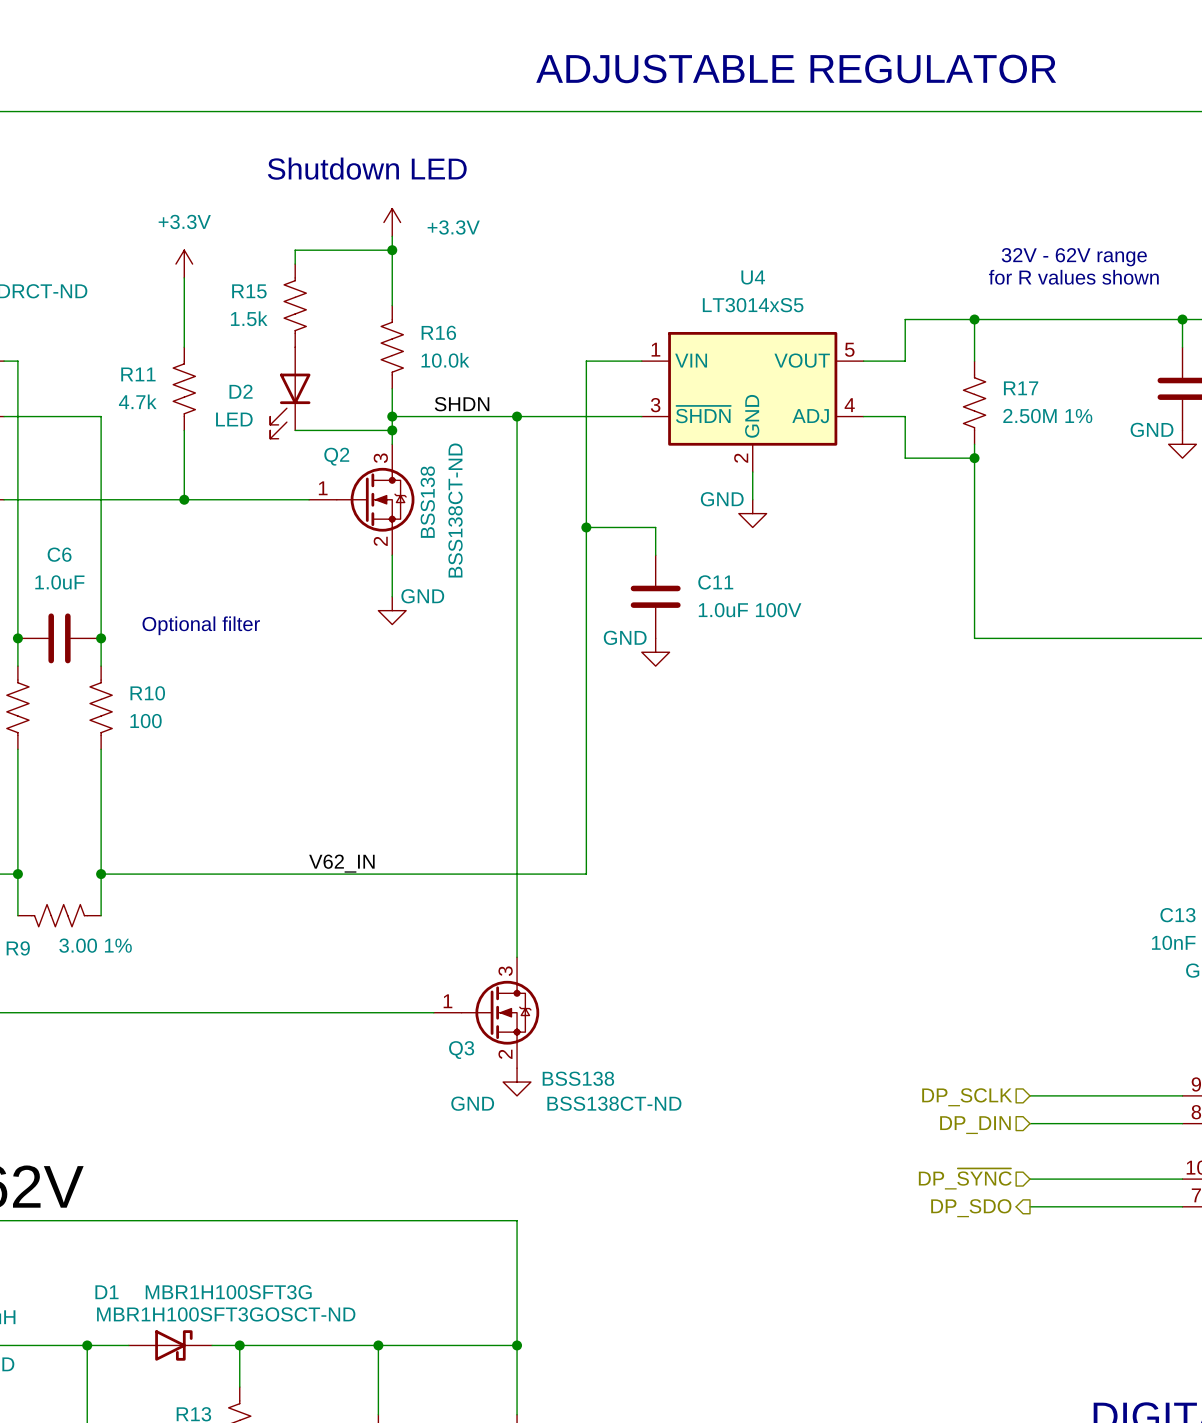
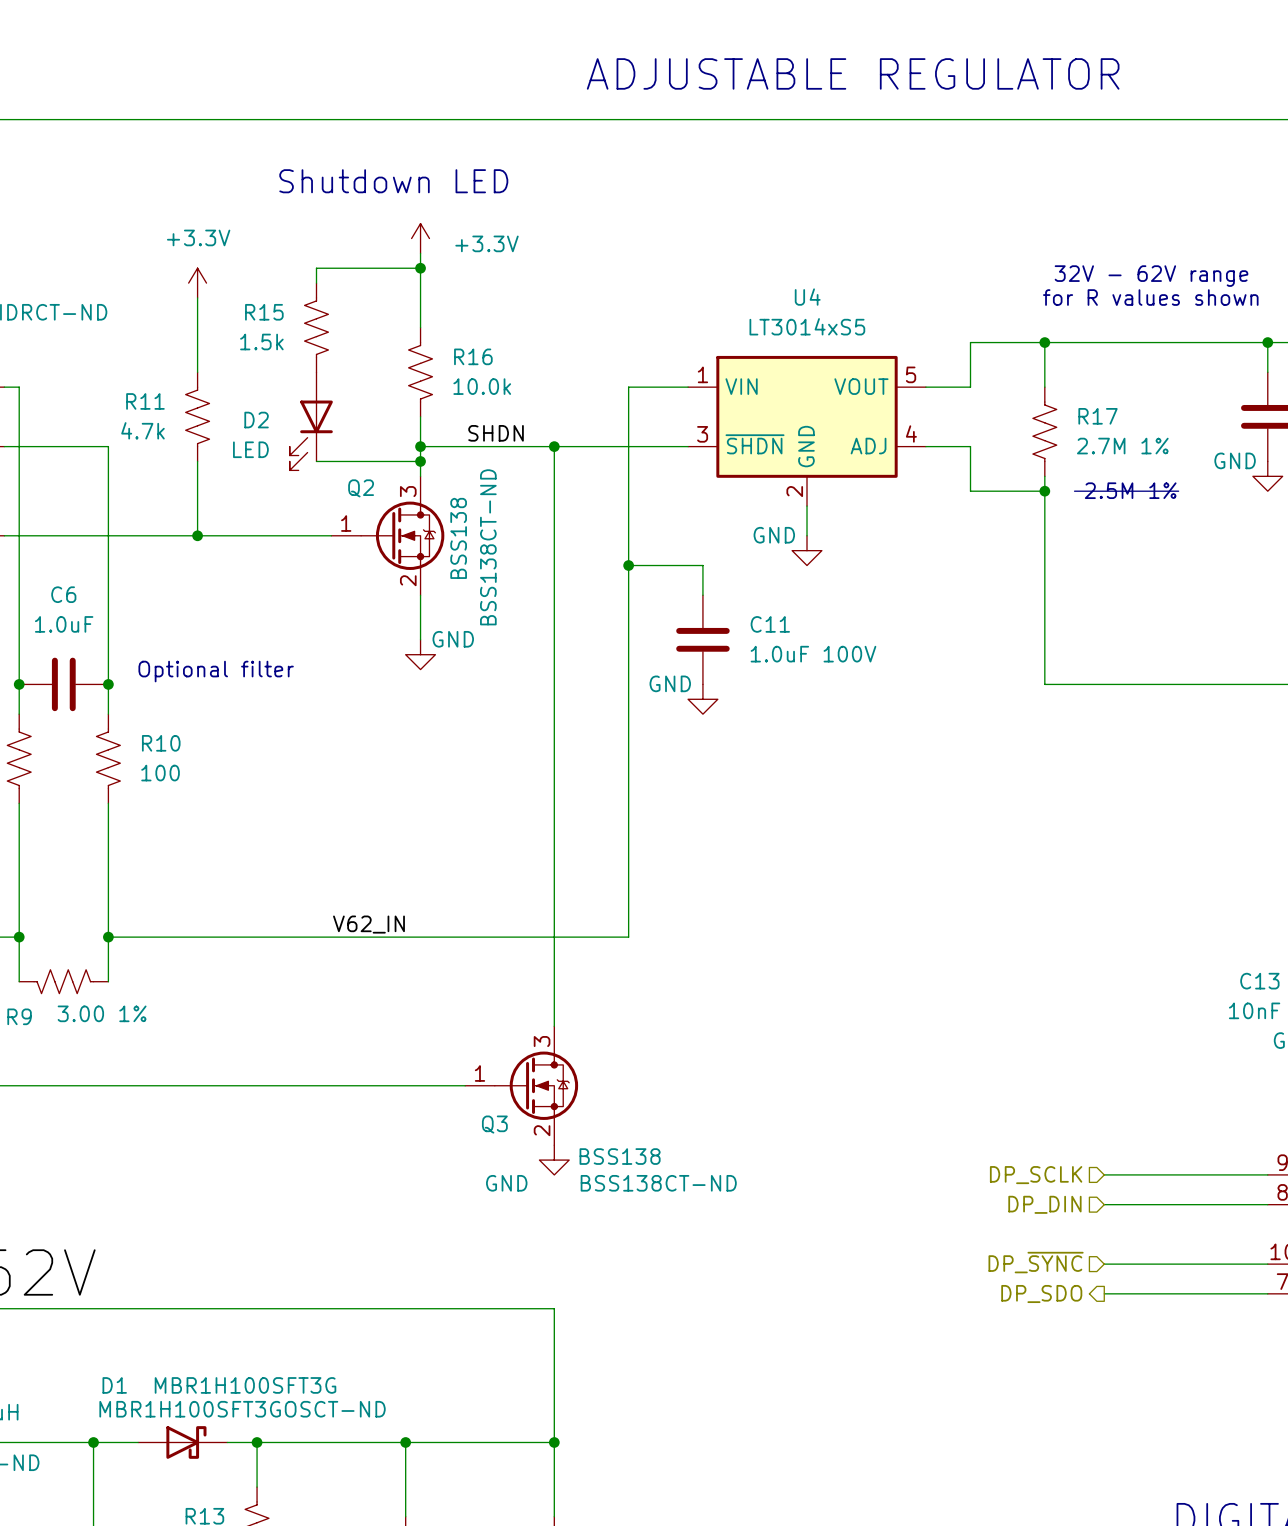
R17 value: 2.50M 1% (1047, 416) -> 2.7M 1% (1122, 446)
text: none -> 2.5M 1% (1130, 490)
line: none -> (1074, 491) (1178, 491)

